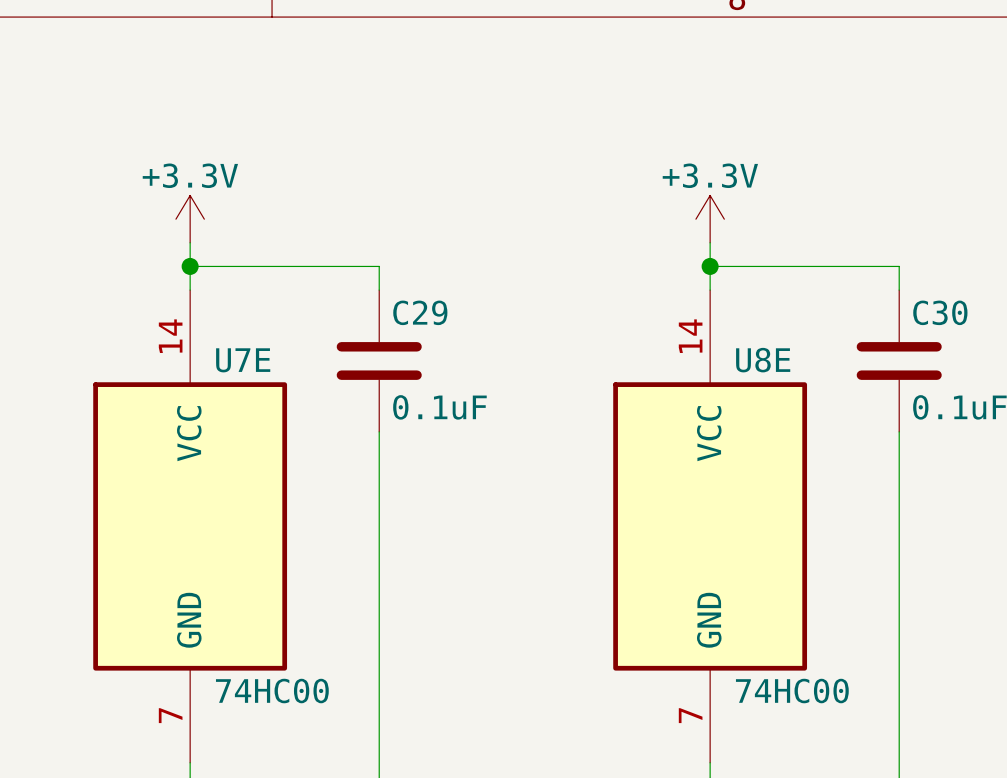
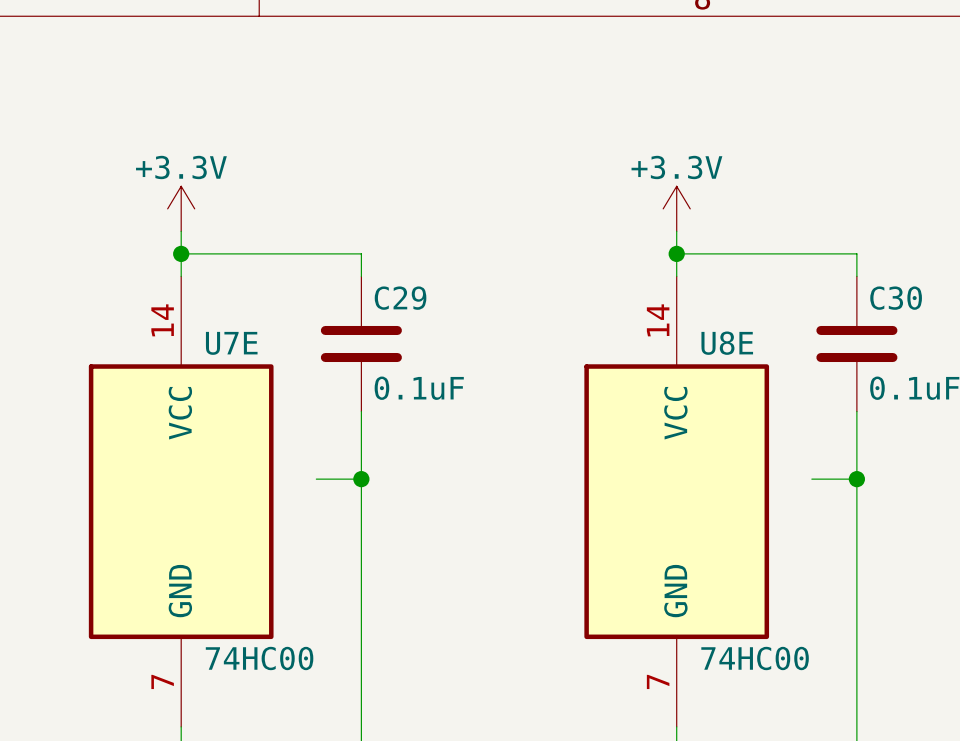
wire: none -> (316, 479) (361, 479)
junction: none -> (361, 479)
wire: none -> (811, 479) (856, 479)
junction: none -> (856, 479)

